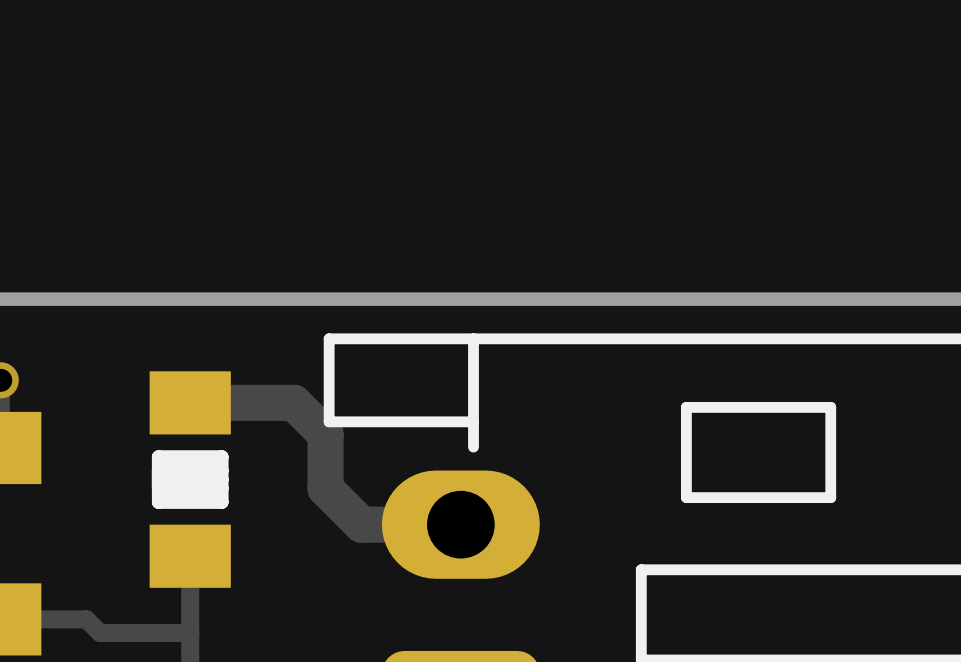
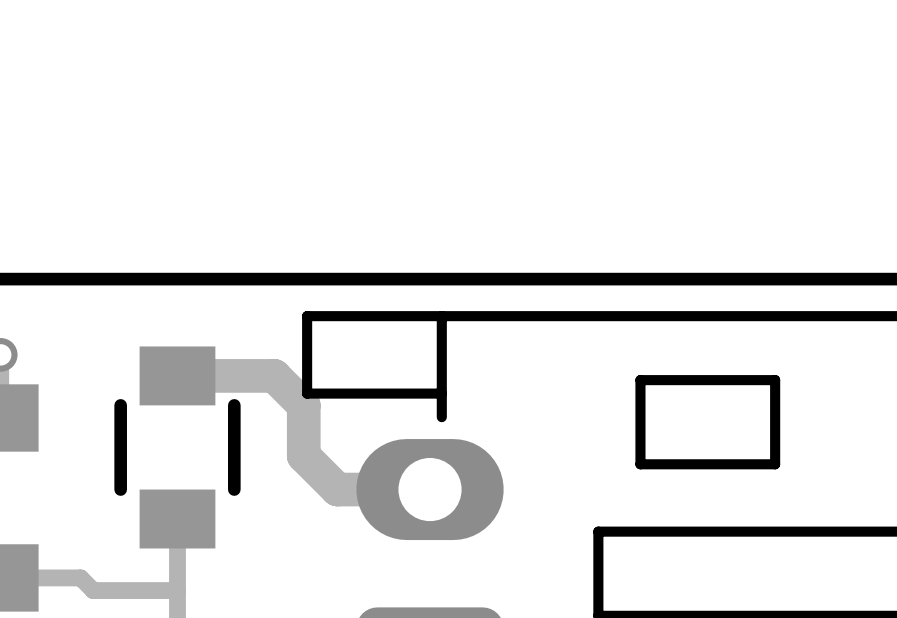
part footprint: [149, 371, 231, 588] -> [114, 346, 241, 549]

